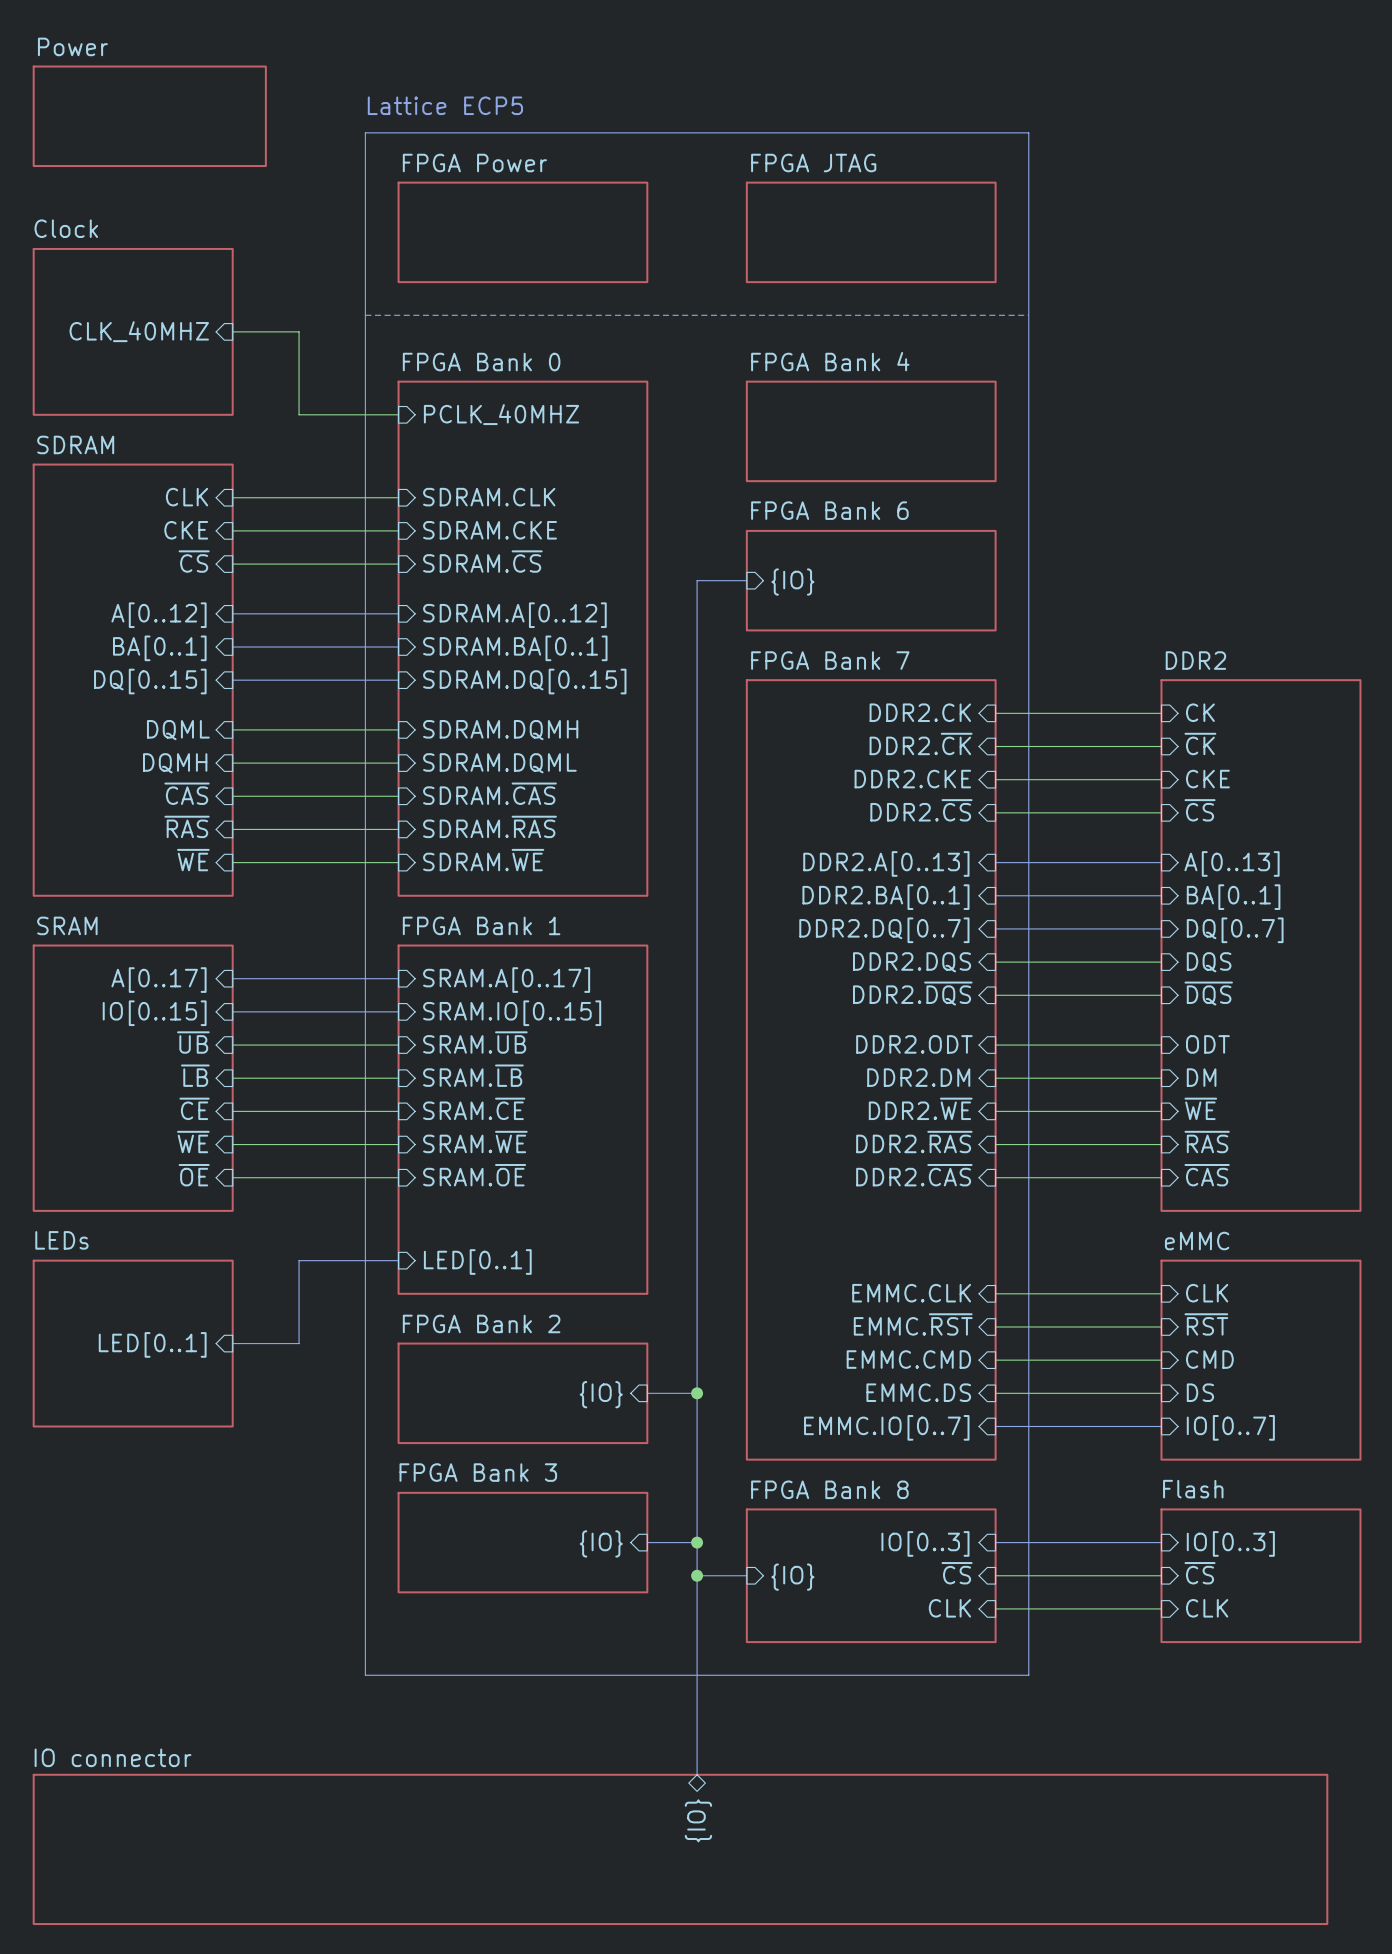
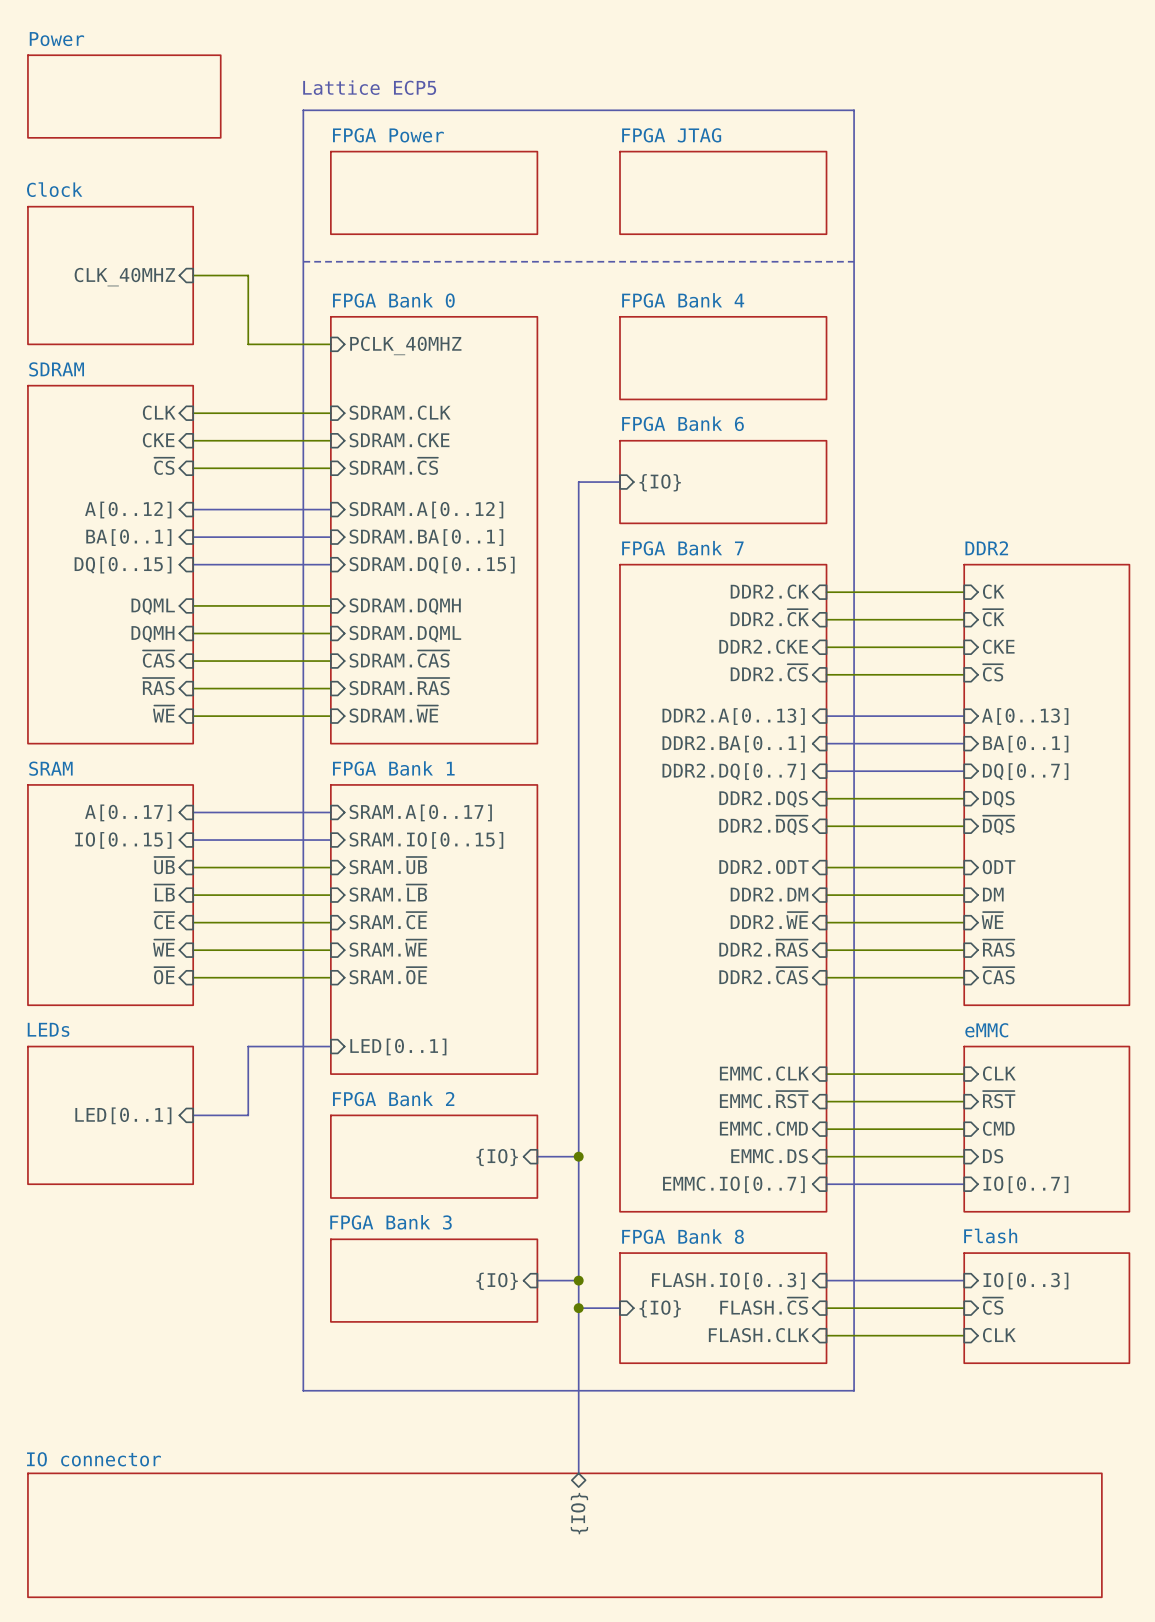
sheet pin: IO[0..3] (925, 1543) -> FLASH.IO[0..3] (728, 1281)
sheet pin: ~{CS} (957, 1573) -> FLASH.~{CS} (764, 1306)
sheet pin: CLK (949, 1608) -> FLASH.CLK (758, 1335)

